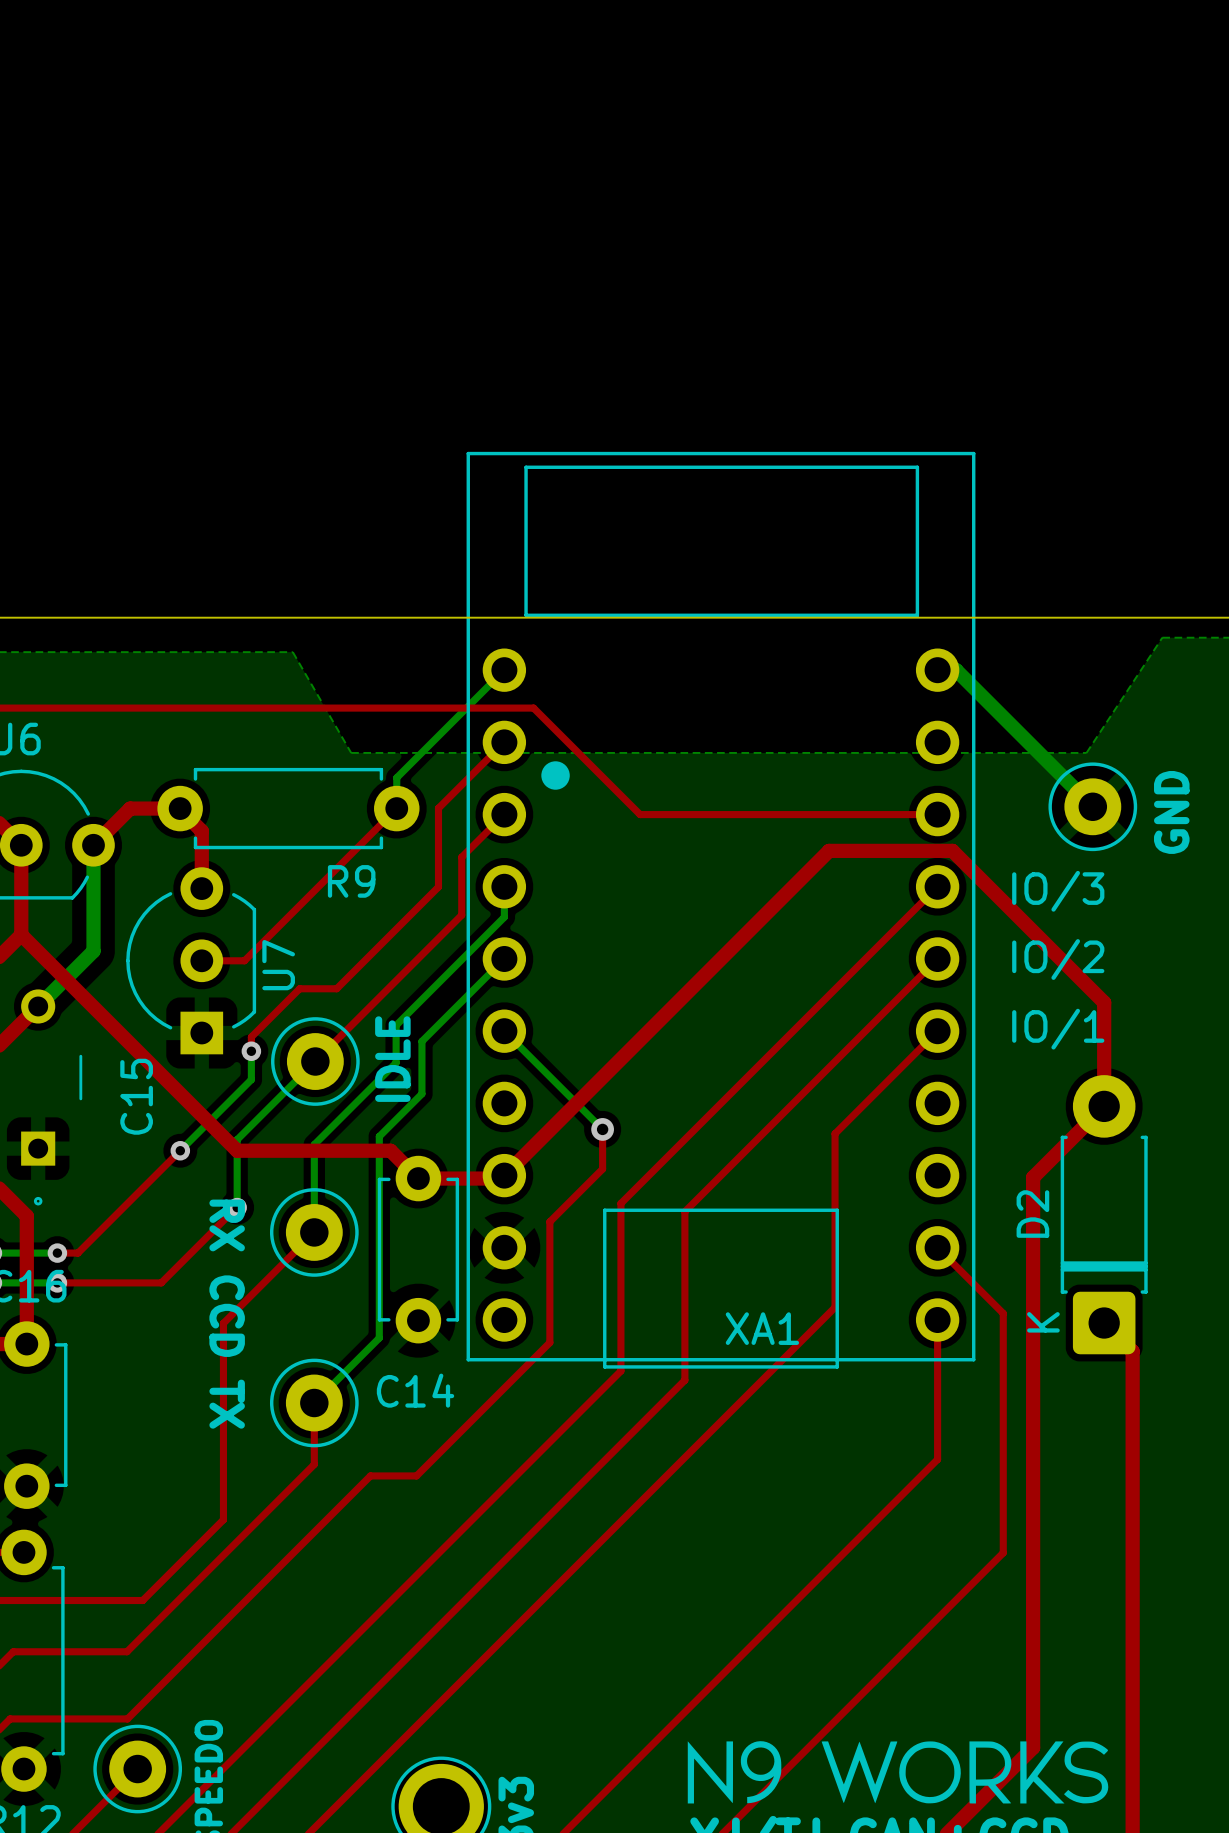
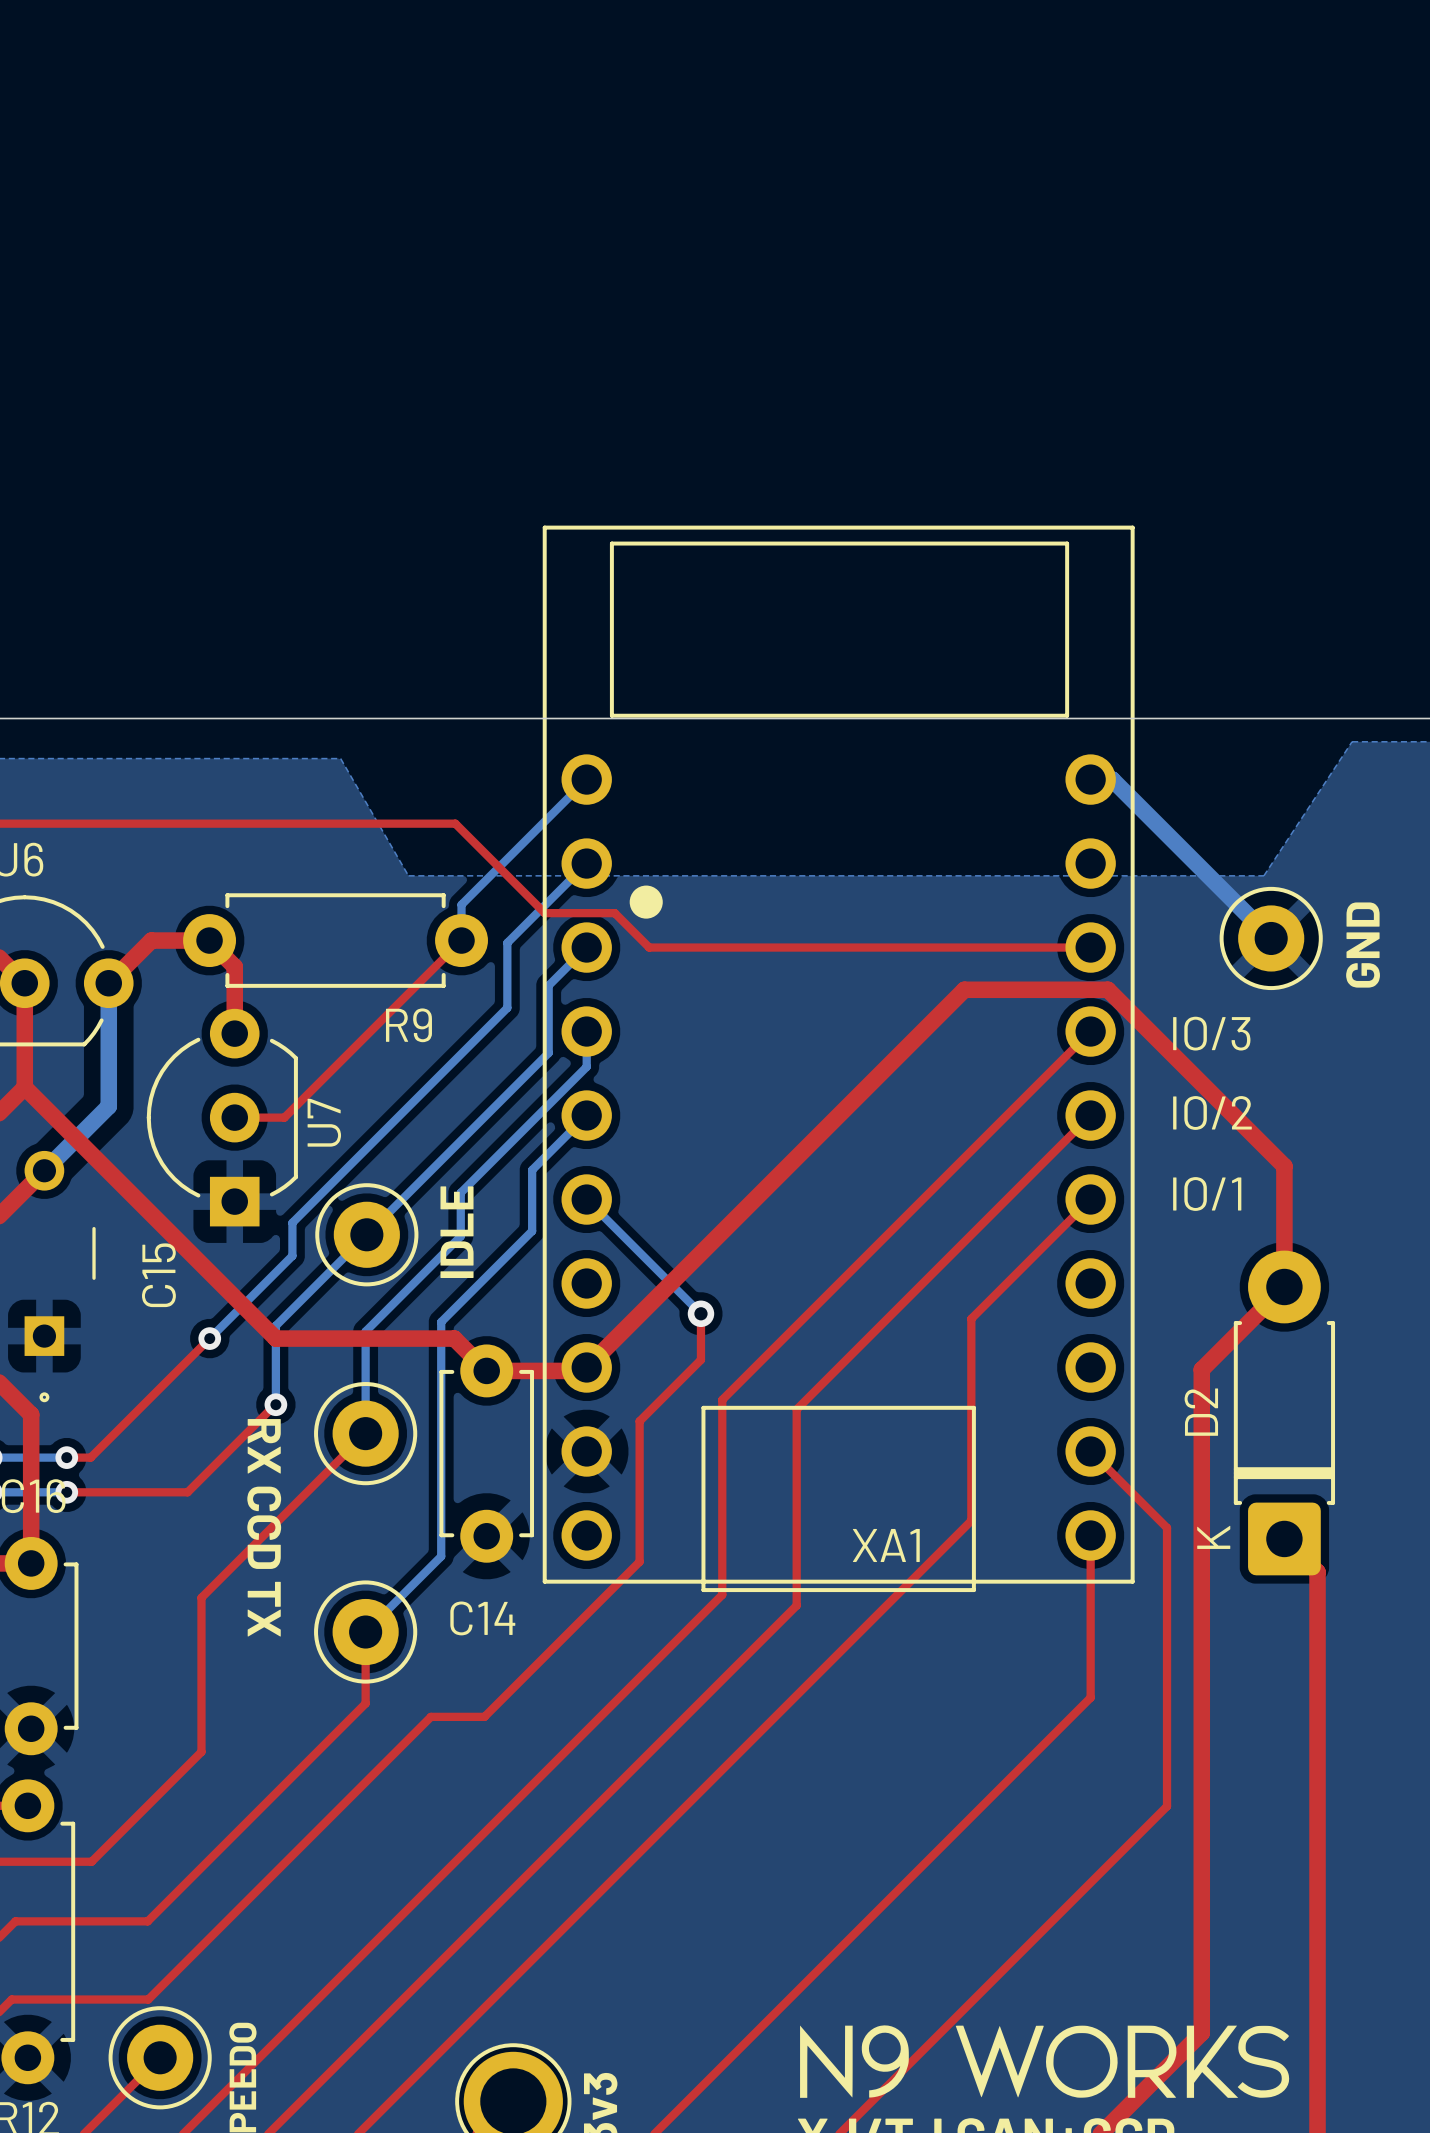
top track: (391, 708) (533, 708) (640, 814) -> (455, 823) (544, 913) (614, 913) (649, 947) (744, 947)
top track: (504, 742) (438, 808) (438, 887) (336, 988) (299, 988) (251, 1037) (251, 1051) -> none
bottom track: none -> (586, 863) (507, 942) (507, 1007) (292, 1222)
top track: (504, 814) (461, 857) (461, 915) (315, 1061) -> none
bottom track: none -> (586, 947) (548, 985) (548, 1052) (366, 1234)
bottom track: (457, 1005) (421, 1041) (421, 1093) -> (532, 1170) (532, 1231) (490, 1272)
via: (251, 1051) -> none
top track: (223, 1323) (223, 1519) (142, 1600) (78, 1600) -> (259, 1539) (201, 1597) (201, 1751) (91, 1861)

